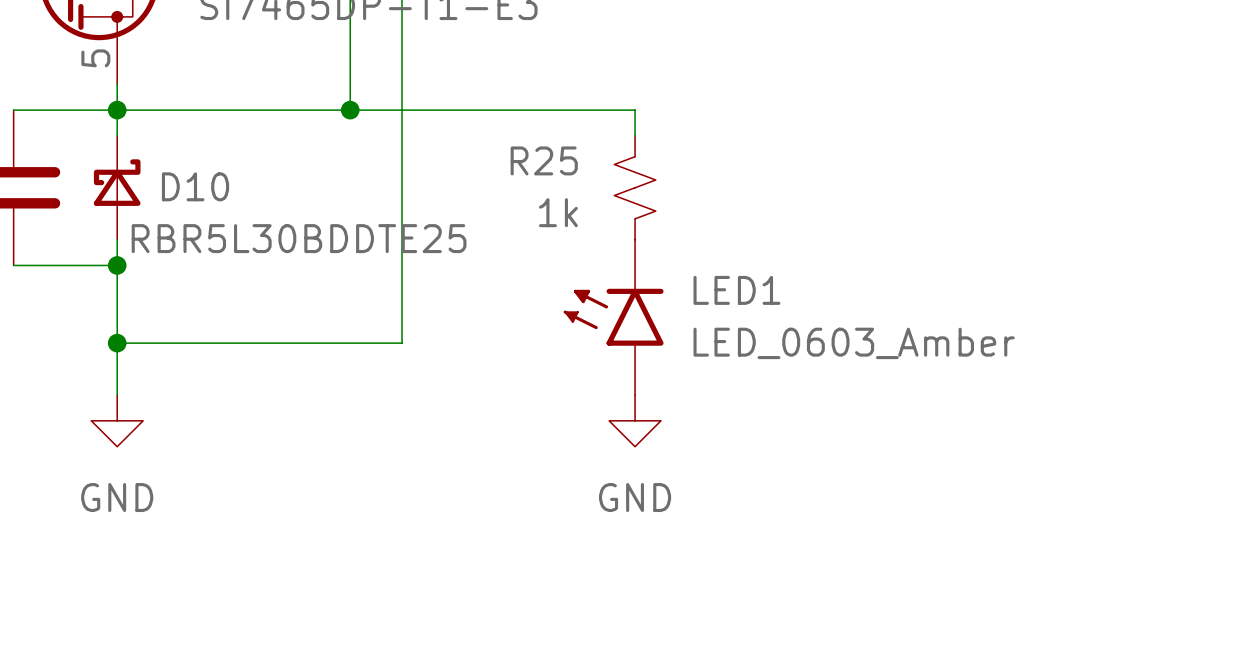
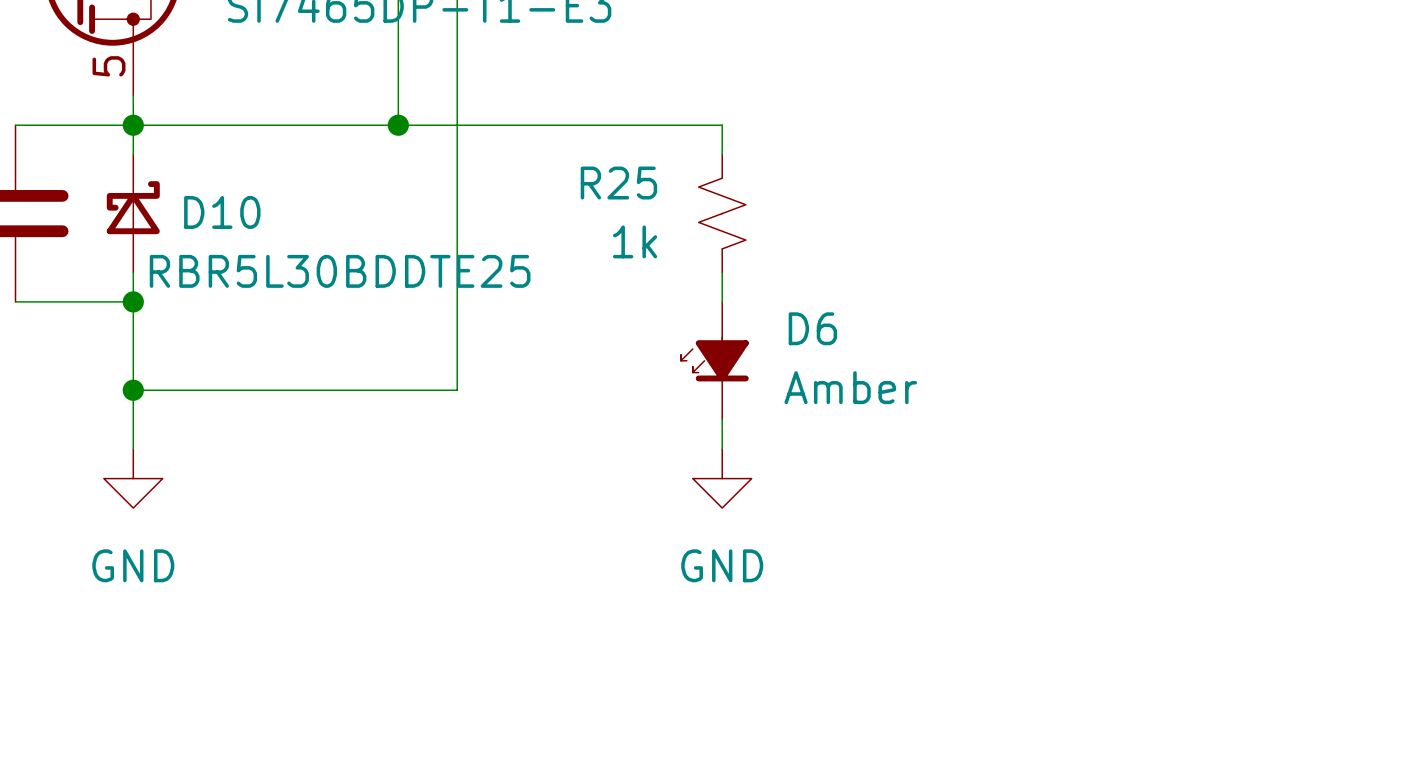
LED1: LED_0603_Amber (613, 317) -> none
D6: none -> Amber (714, 360)

